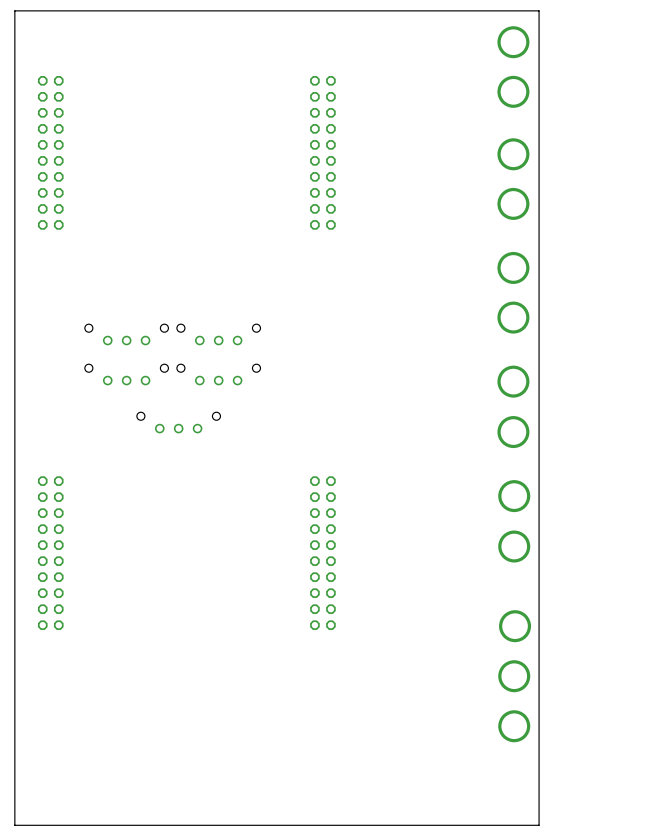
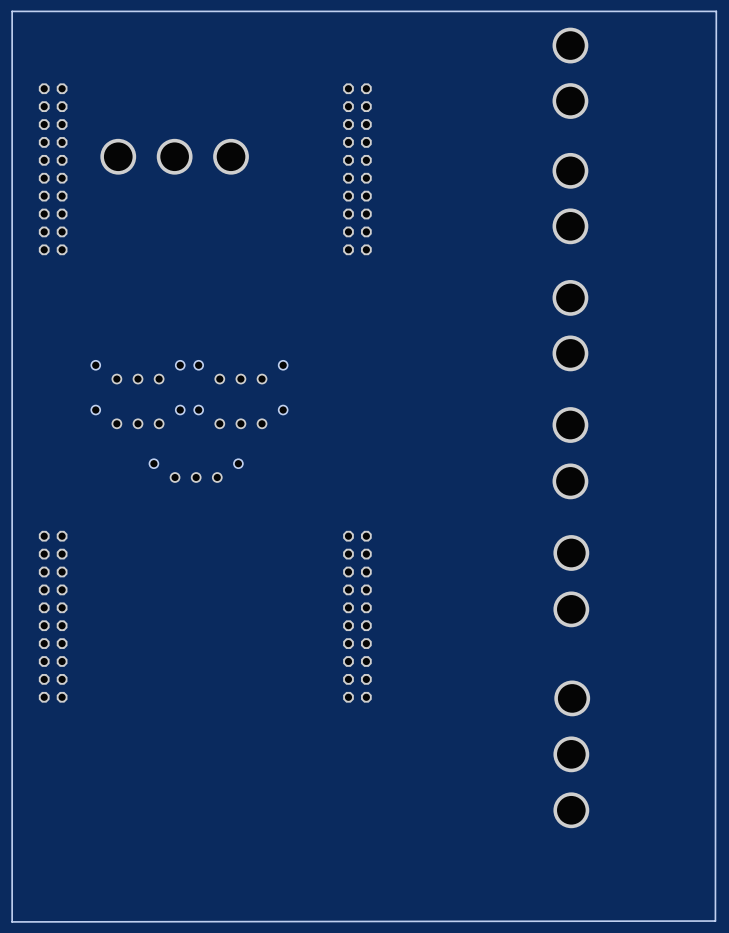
board edge: (539, 10) (14, 10) (14, 825) (539, 825) (539, 10) -> (716, 11) (715, 921) (12, 921) (12, 11) (716, 11)
part: none -> (118, 156)
part: none -> (174, 156)
part: none -> (231, 156)

